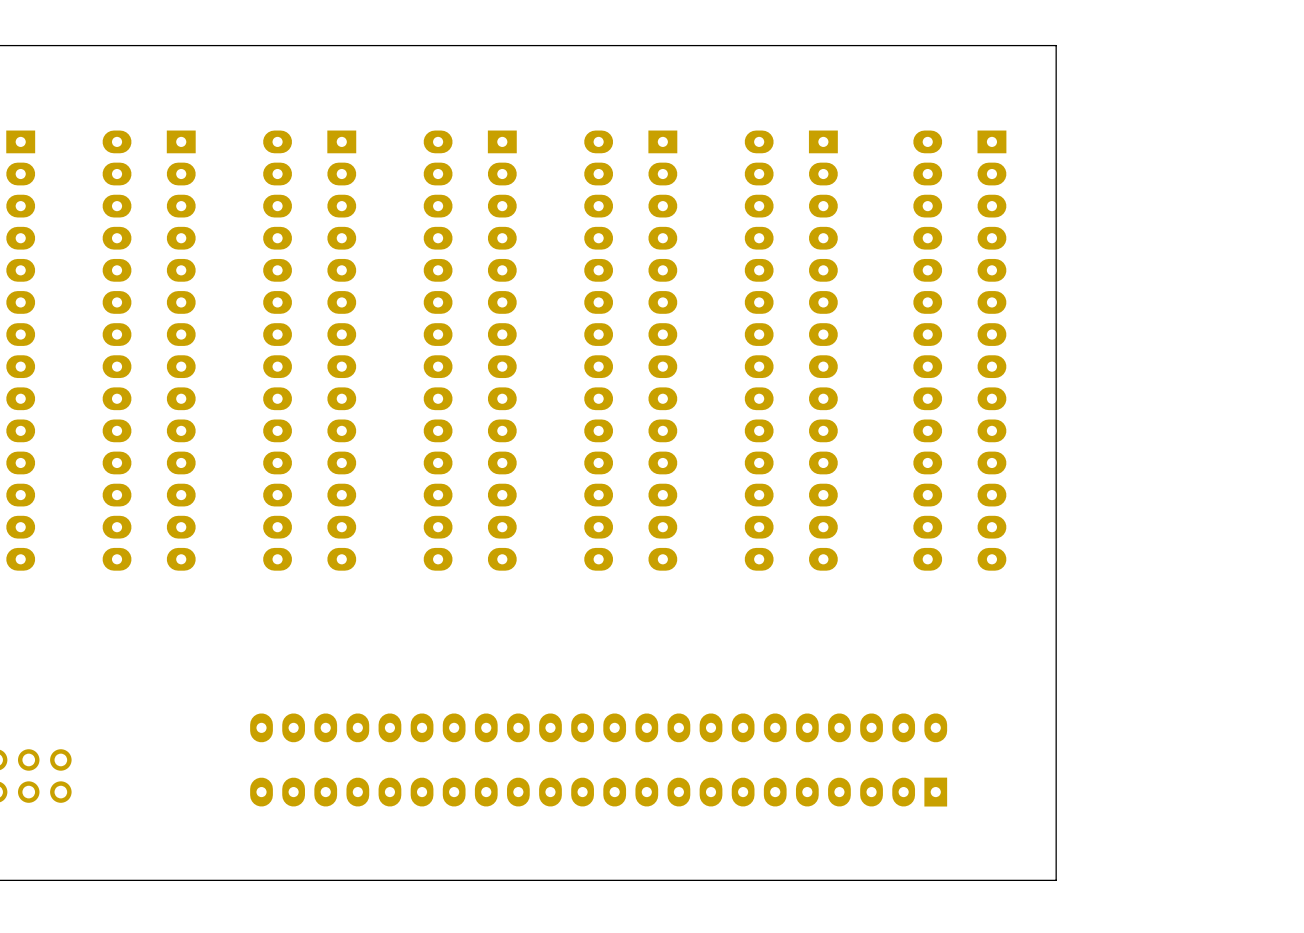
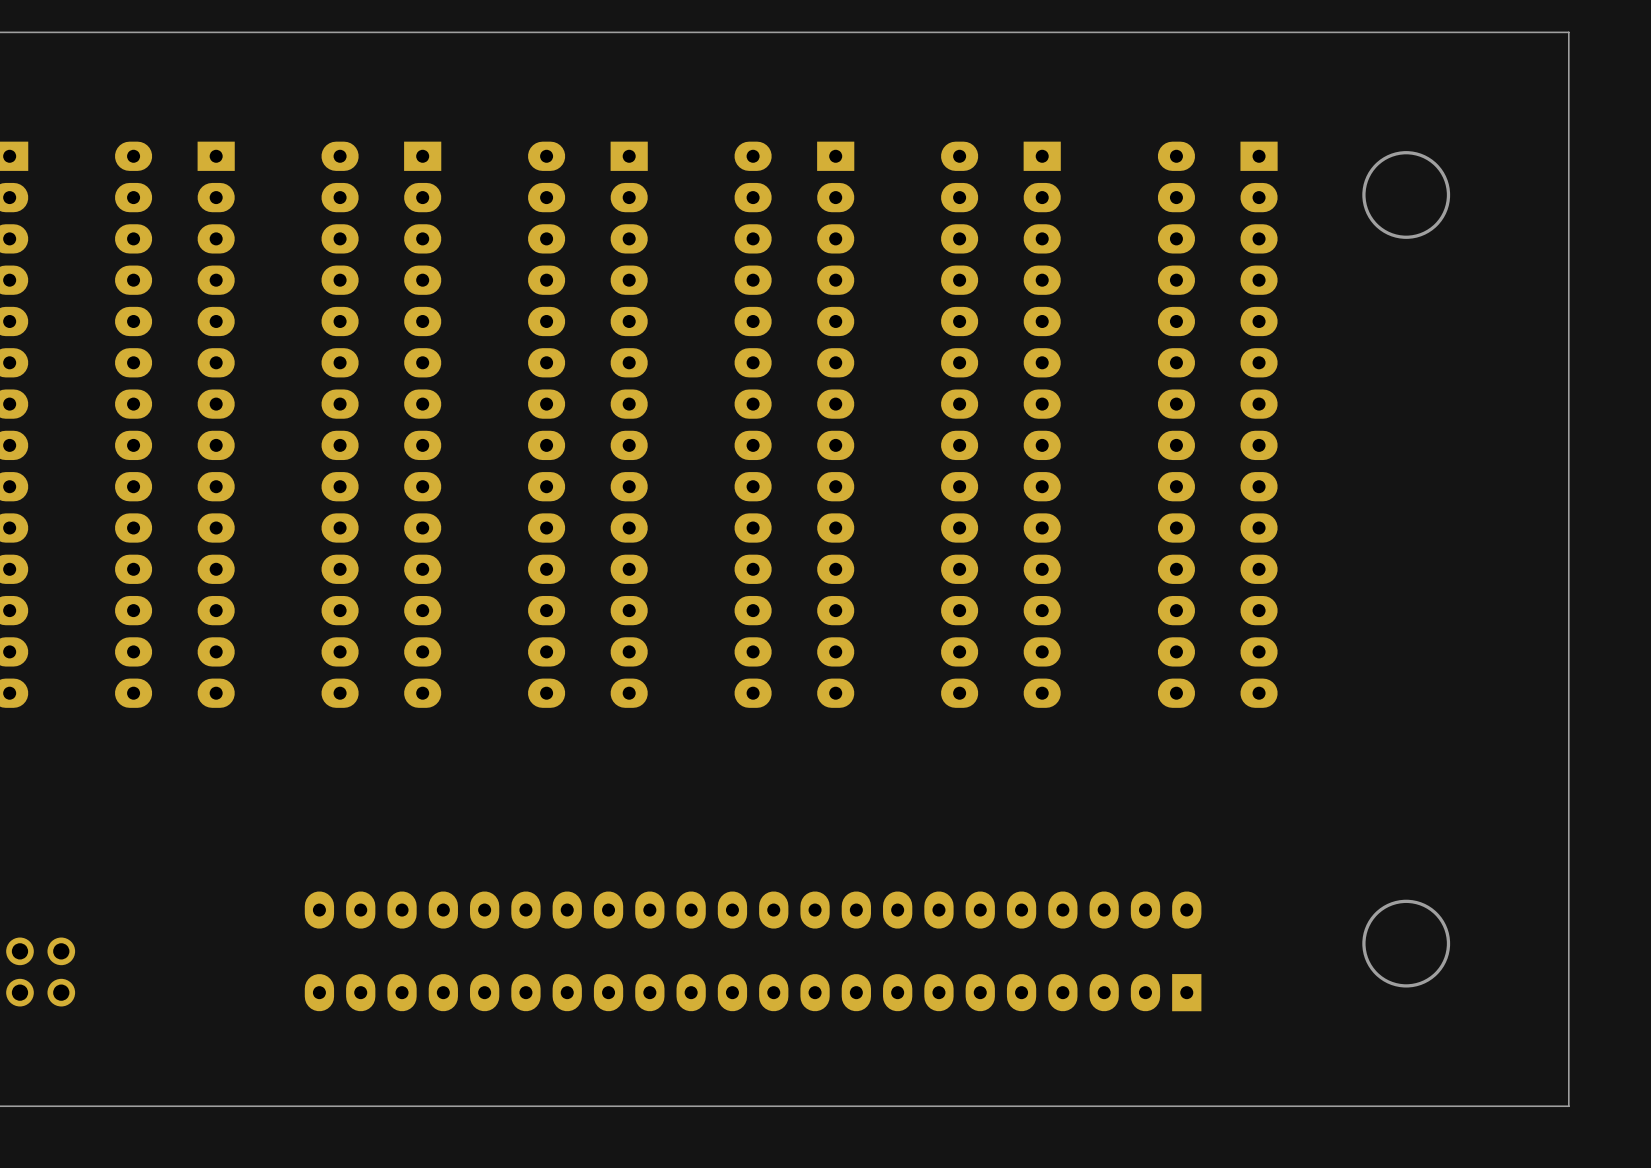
board edge: (1056, 45) (1056, 880) -> (1341, 32) (1568, 32) (1568, 1106) (1341, 1106)
round board edge: none -> [1362, 151, 1451, 239]
round board edge: none -> [1362, 899, 1451, 988]

